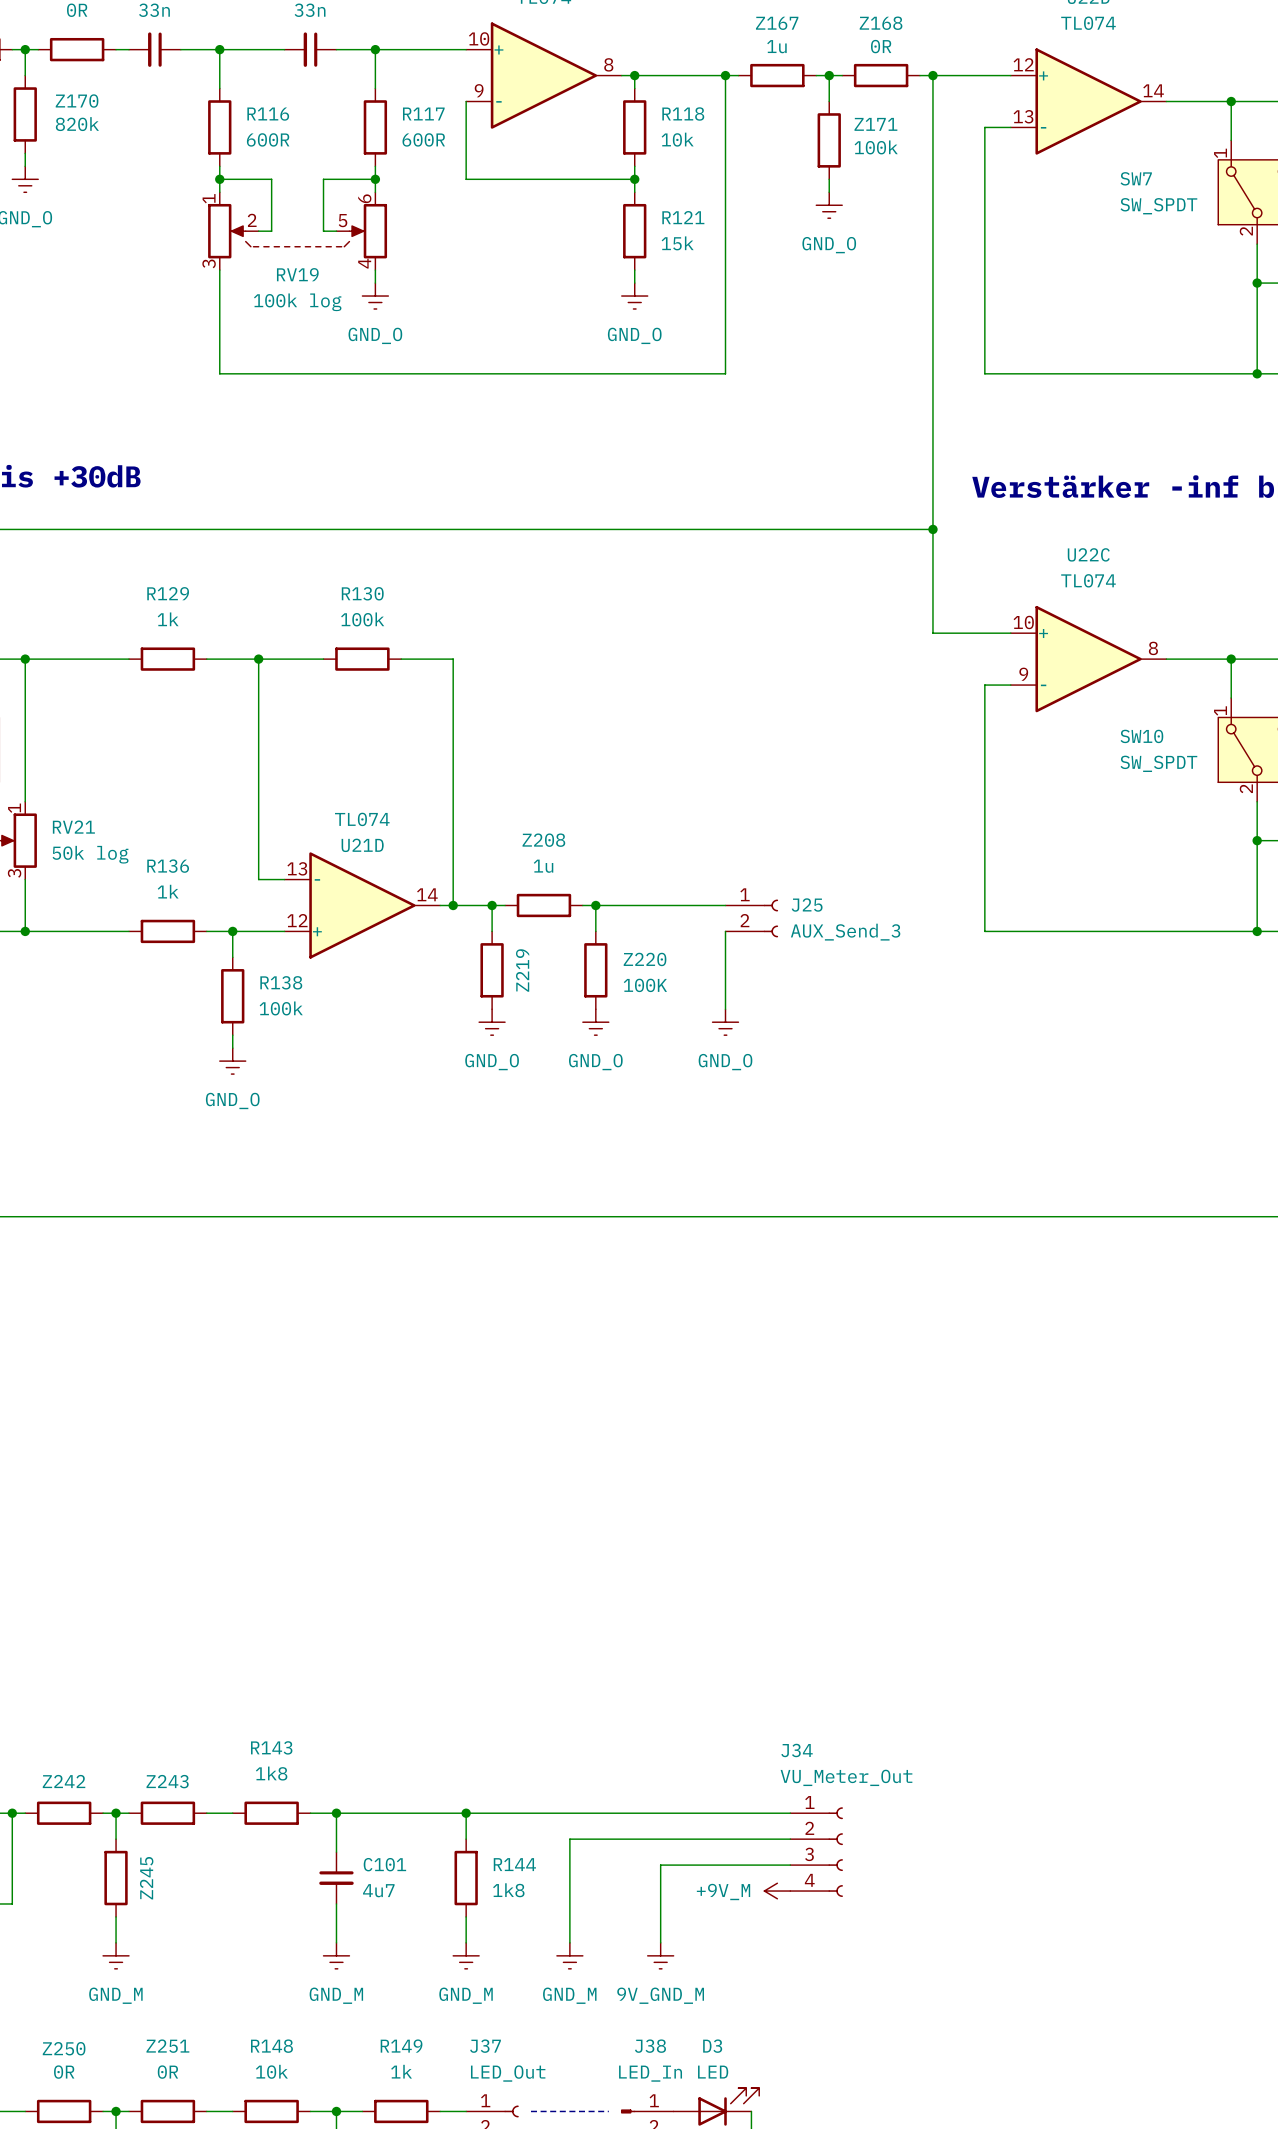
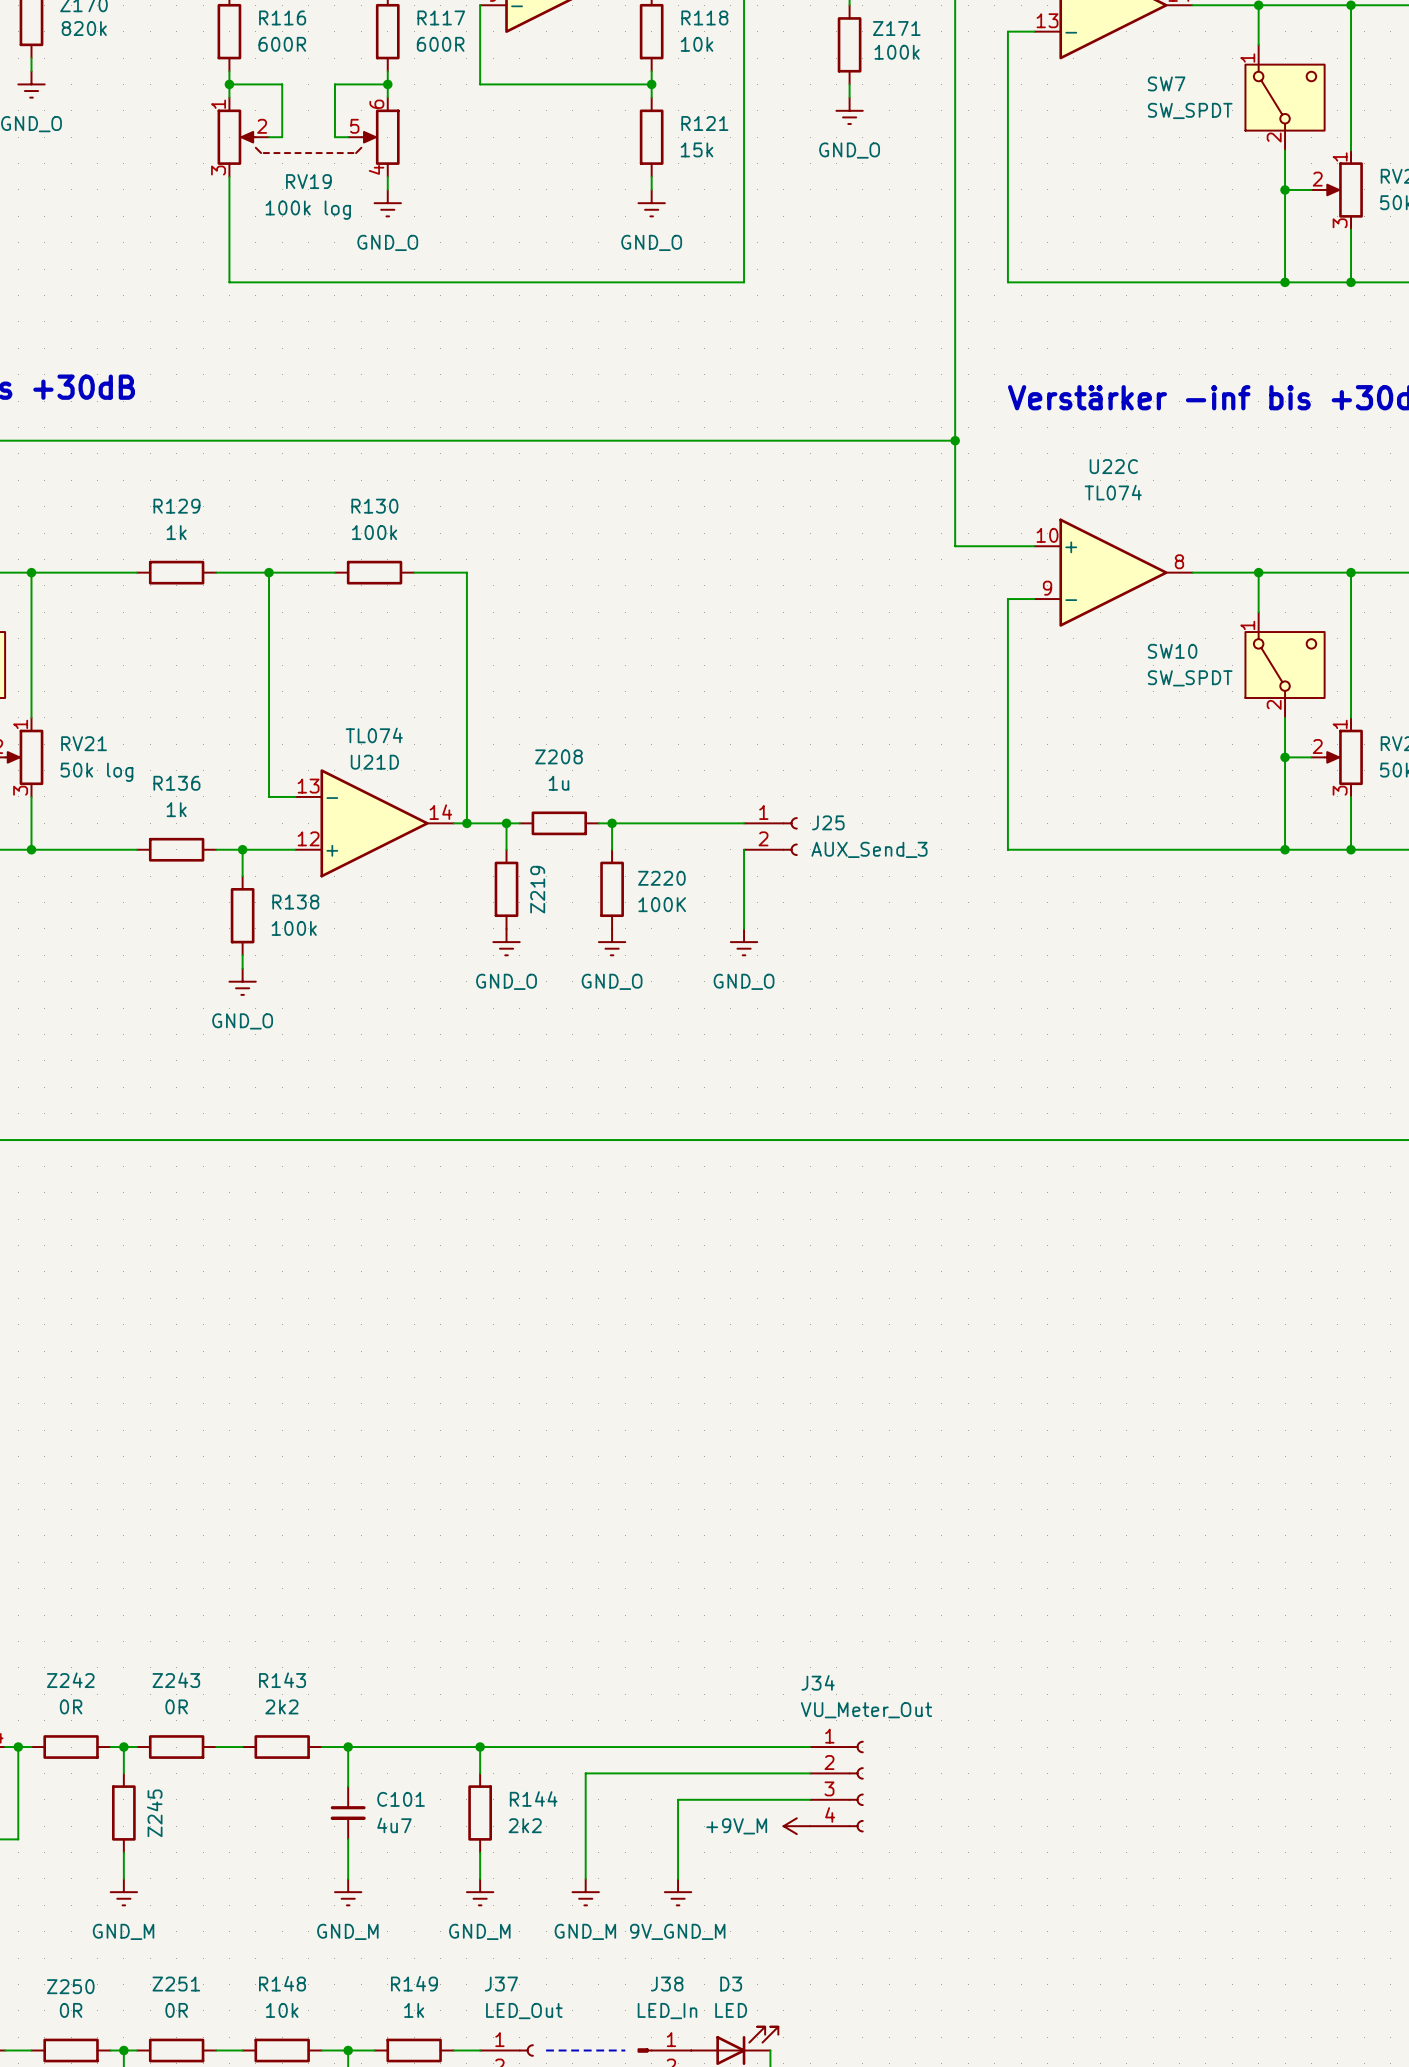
Z242 value: none -> 0R (71, 1706)
Z243 value: none -> 0R (176, 1706)
R143 value: 1k8 (271, 1773) -> 2k2 (281, 1706)
Z242 name position: Z242 (64, 1781) -> Z242 (70, 1680)
Z243 name position: Z243 (167, 1781) -> Z243 (176, 1680)
R144 value: 1k8 (508, 1890) -> 2k2 (525, 1825)

